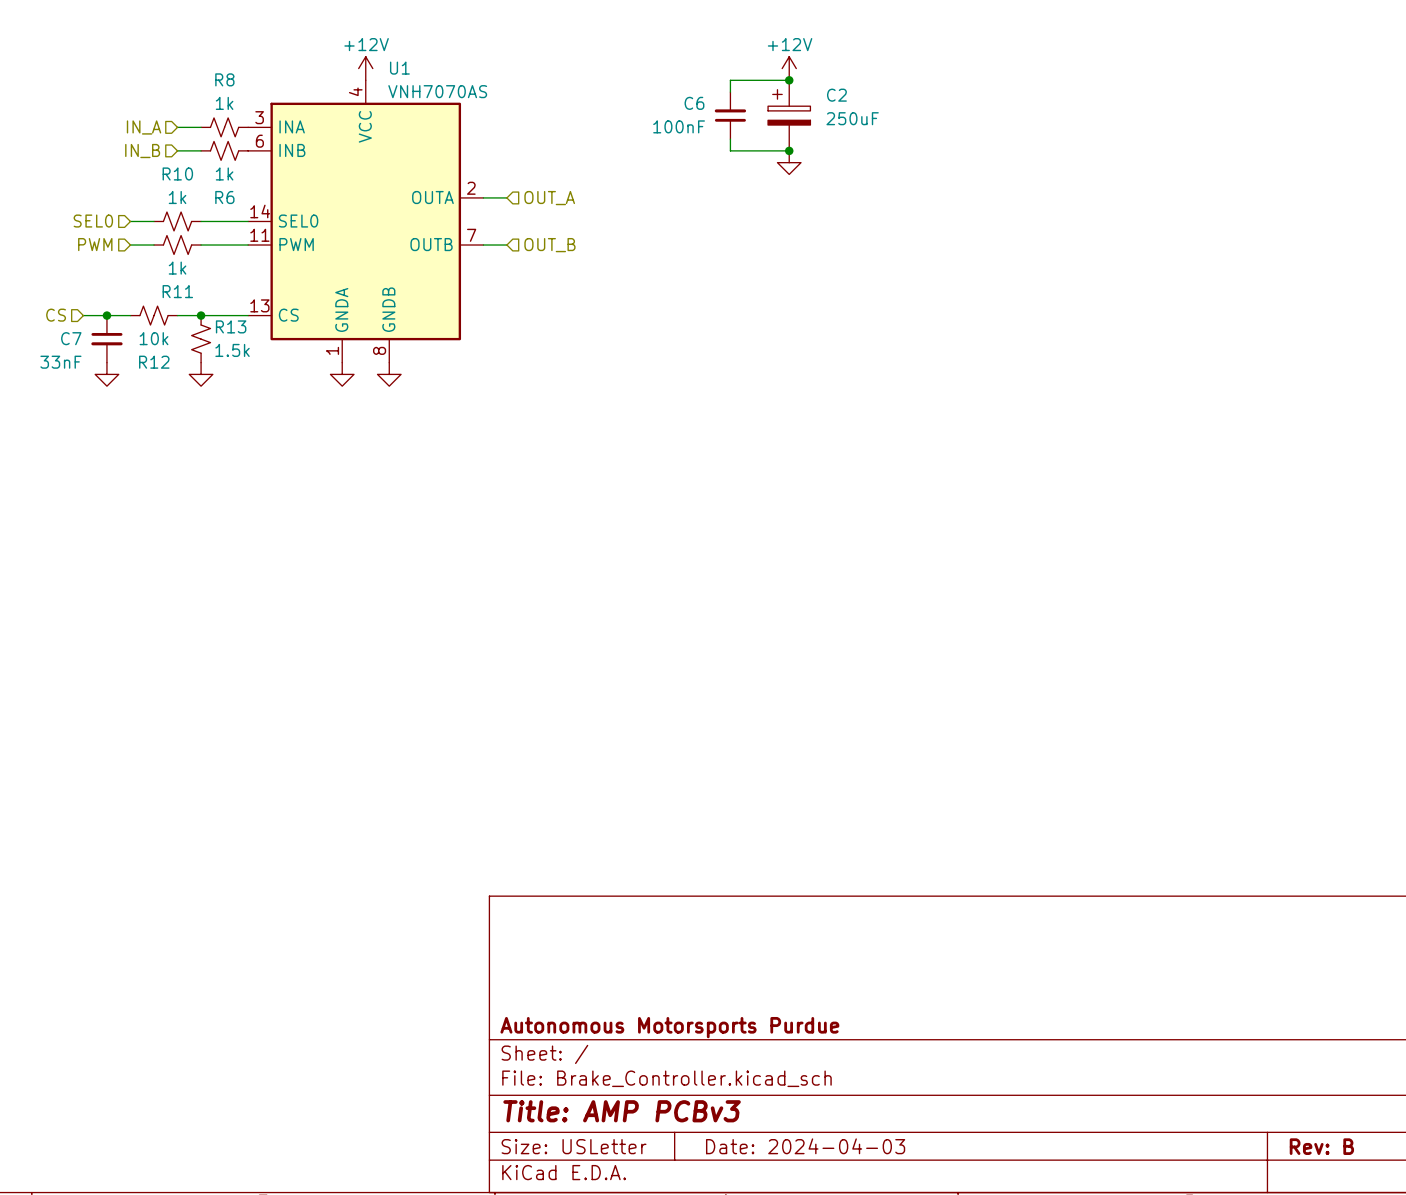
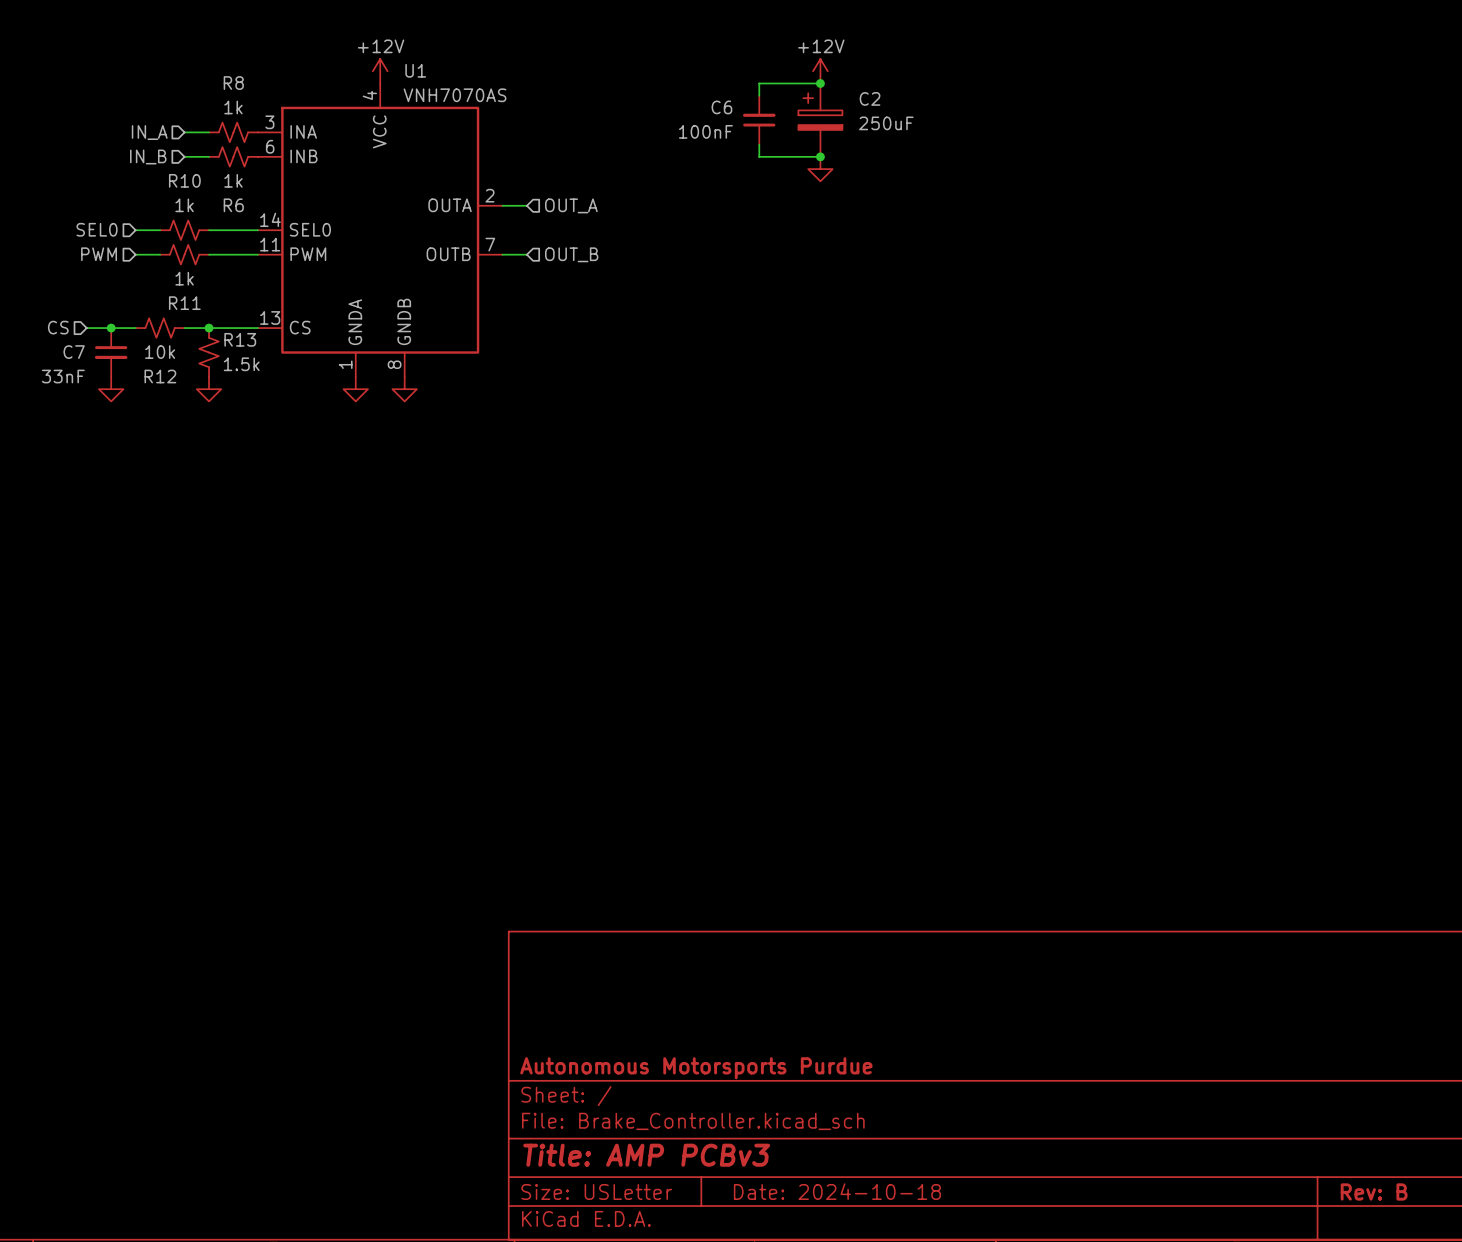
title block: Date: 2024-04-03 (805, 1146) -> Date: 2024-10-18 (837, 1191)

